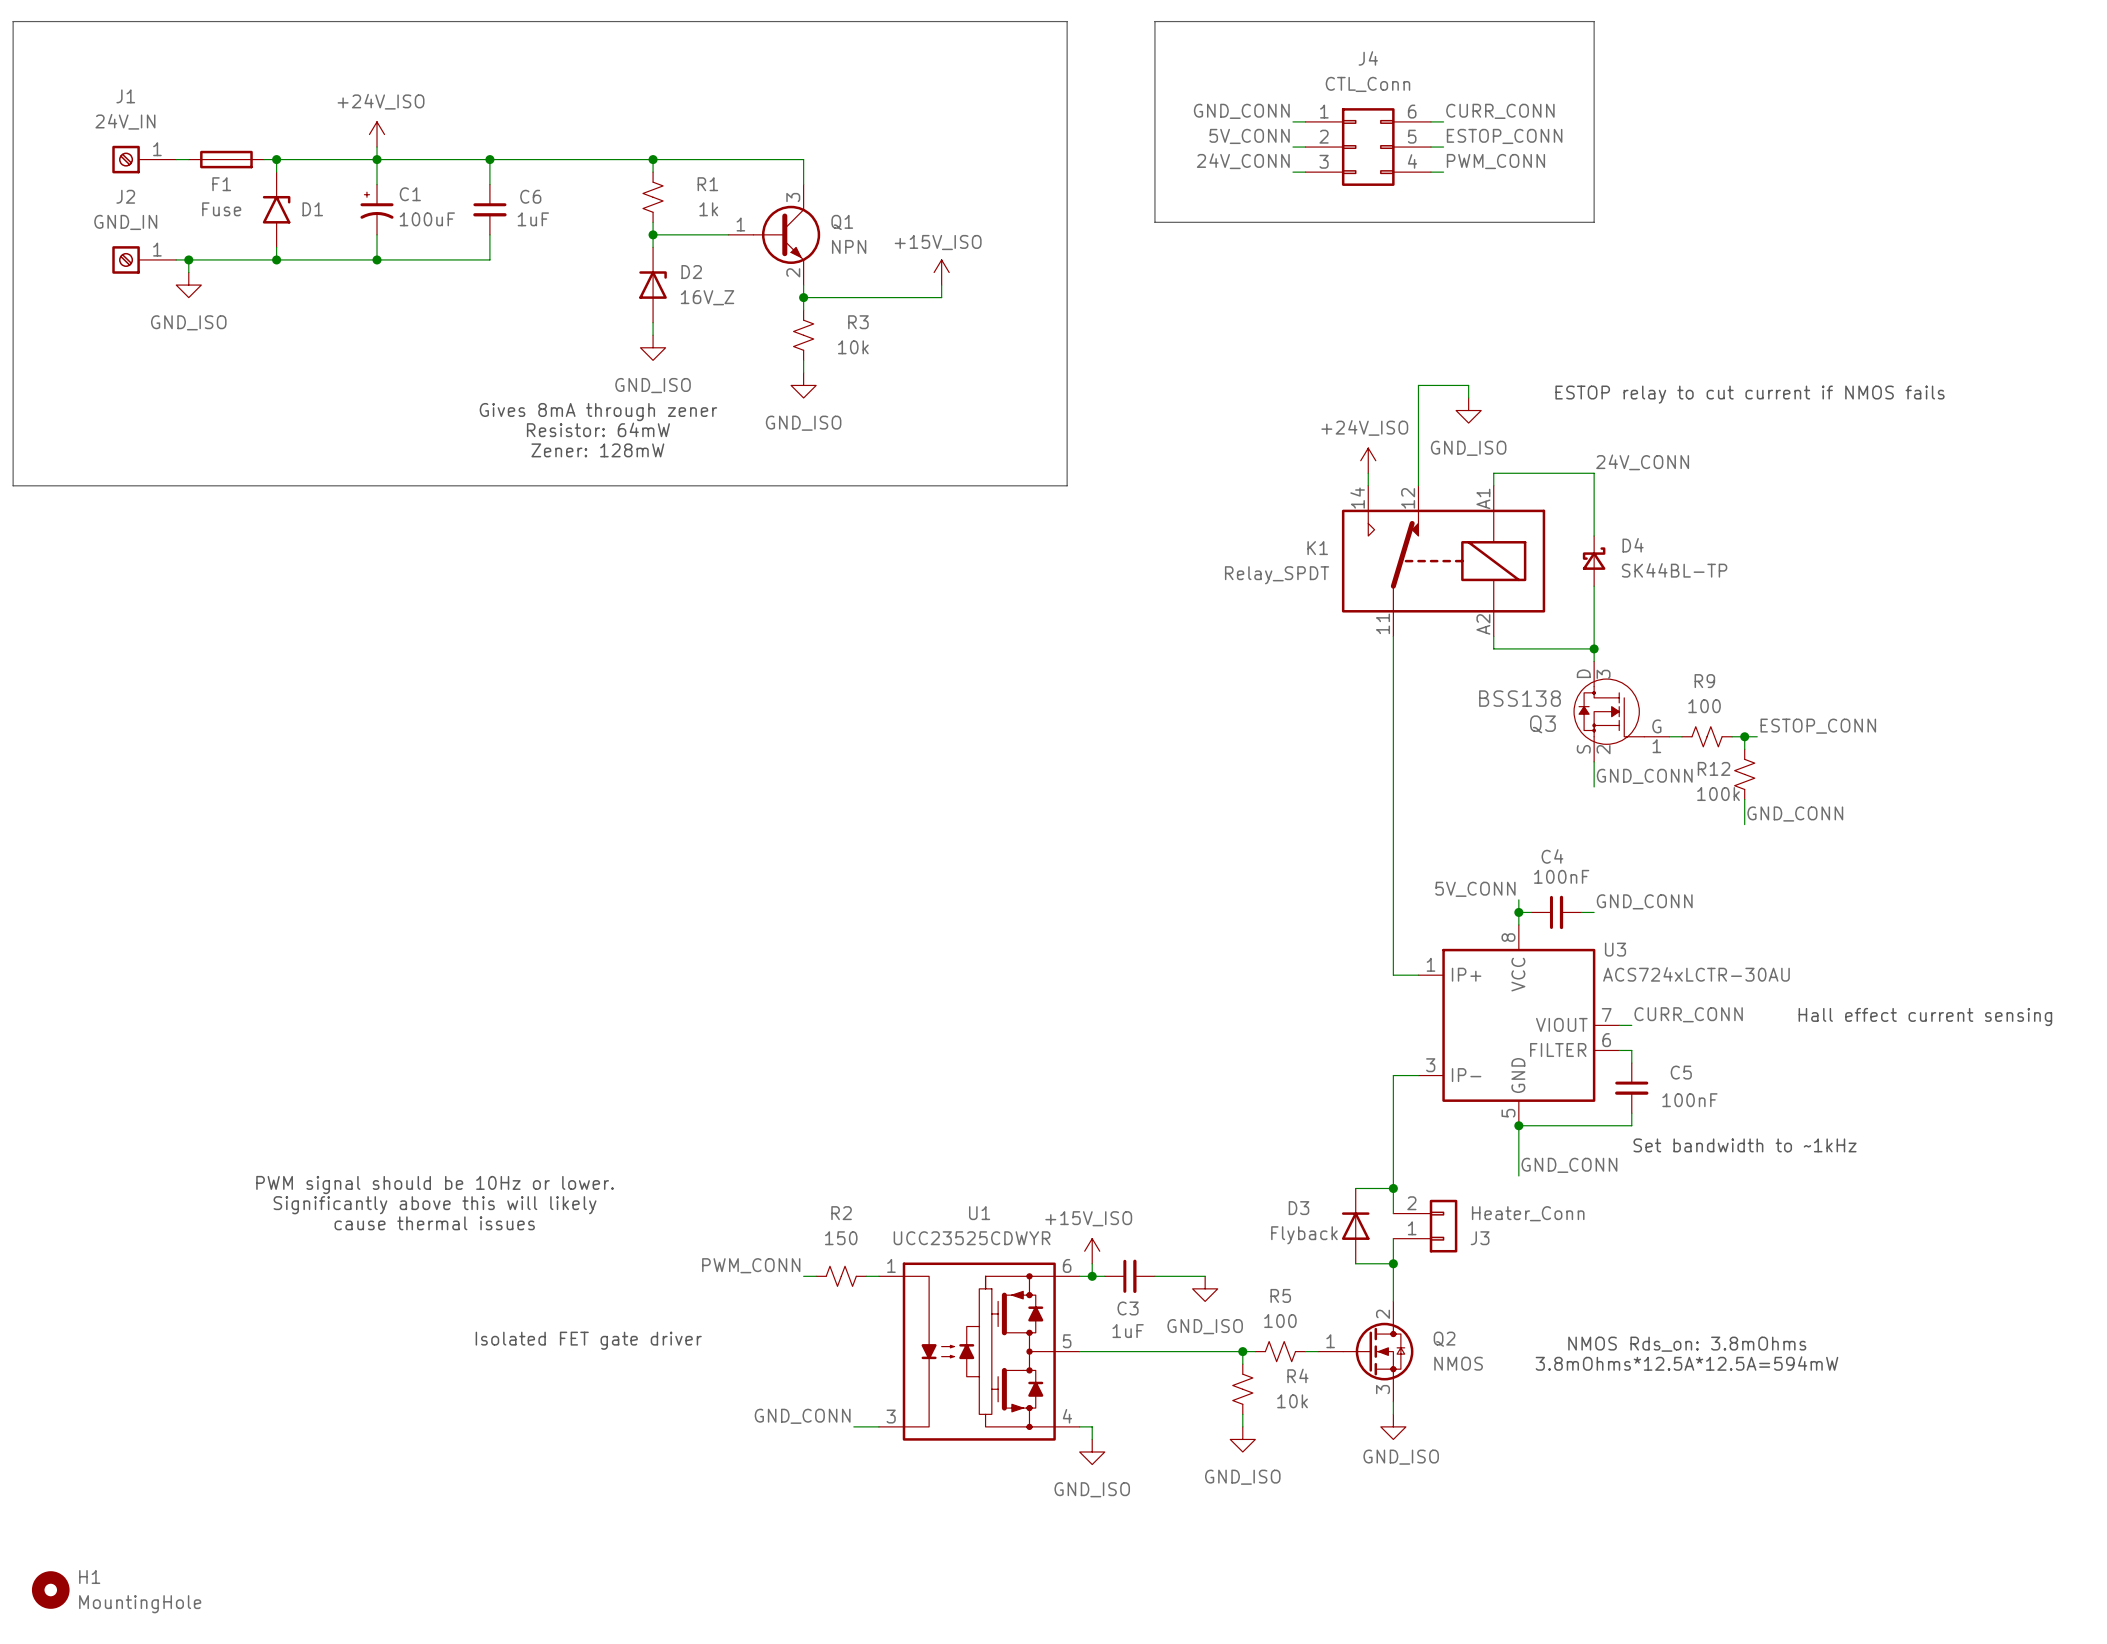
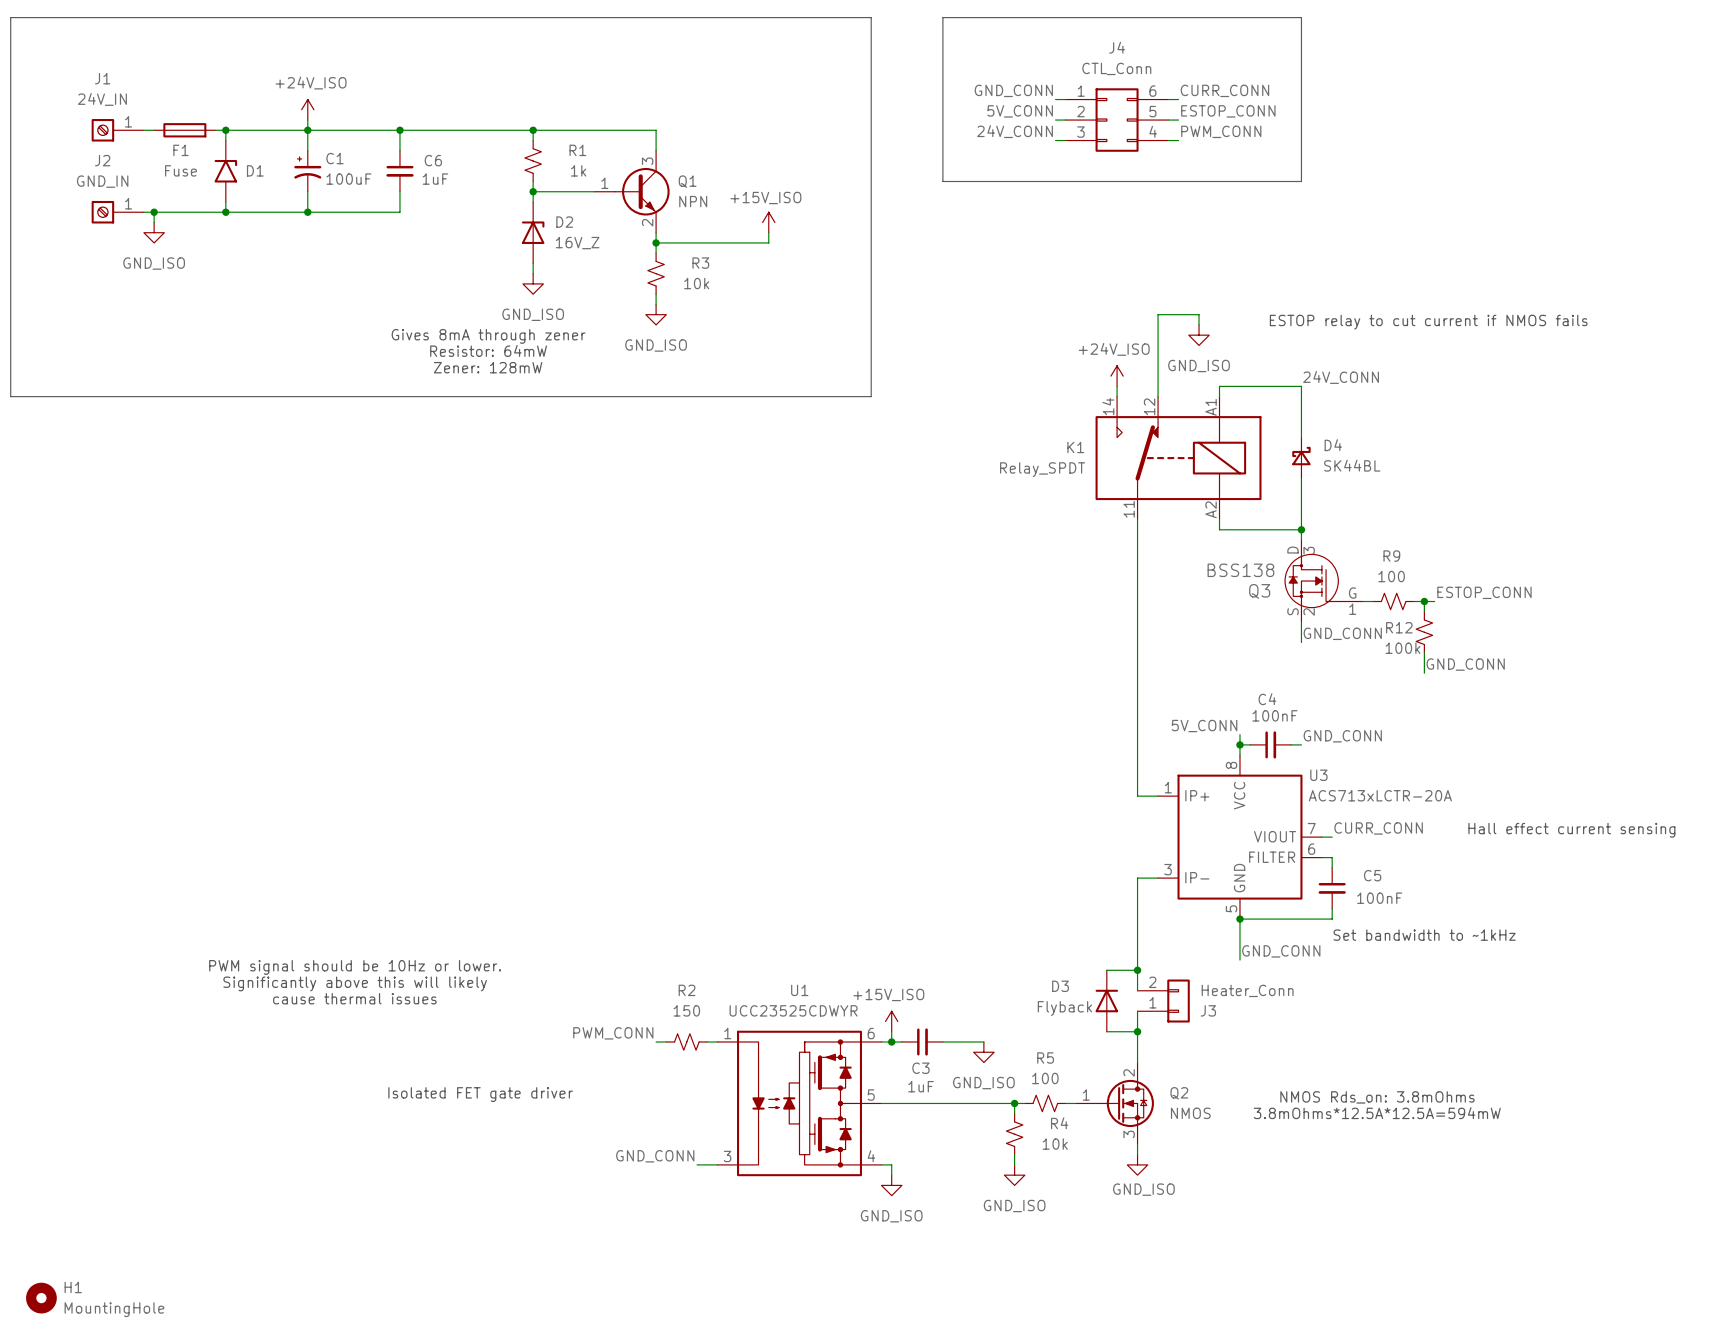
D4 value: SK44BL-TP (1674, 570) -> SK44BL (1352, 465)
U3 value: ACS724xLCTR-30AU (1696, 974) -> ACS713xLCTR-20A (1380, 795)

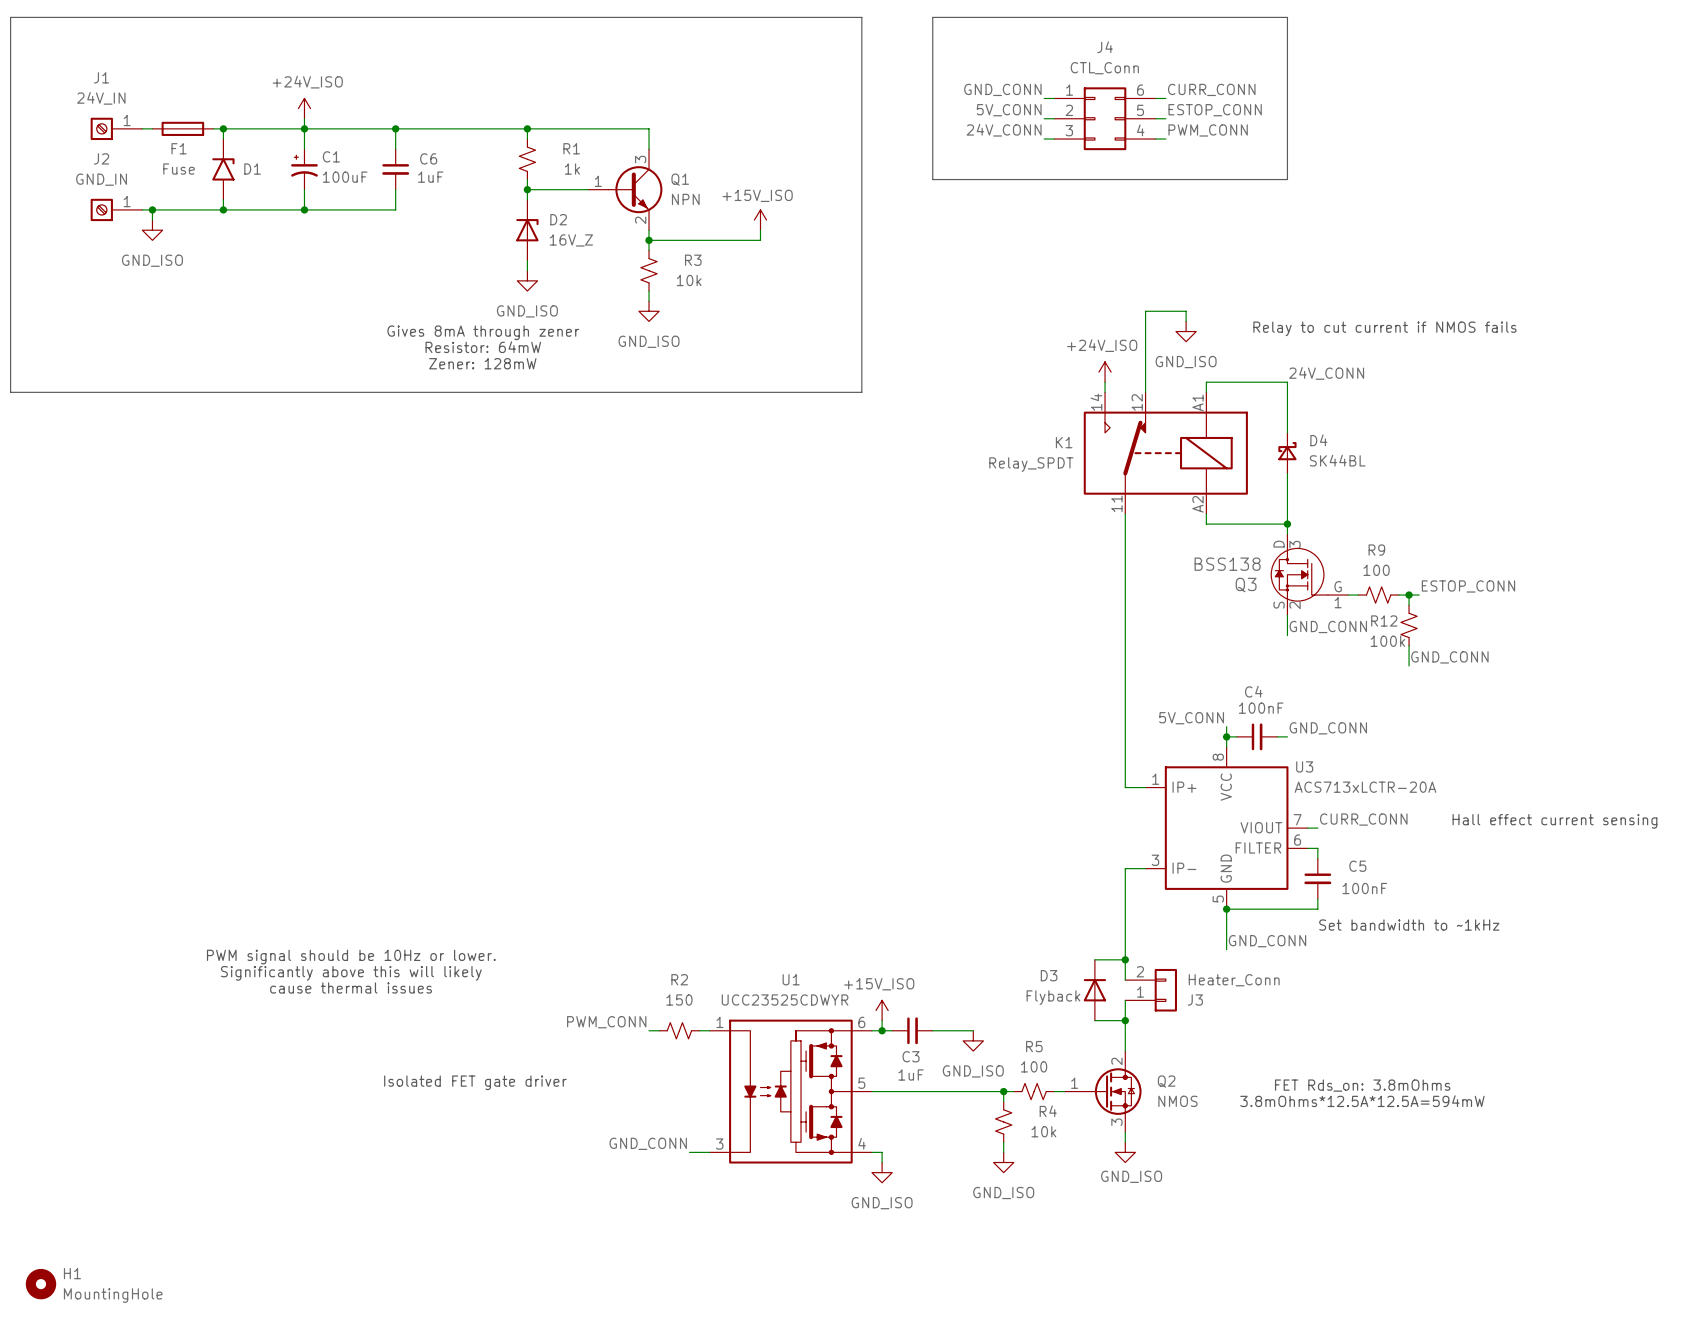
text: ESTOP relay to cut current if NMOS fails (1428, 322) -> Relay to cut current if NMOS fails (1384, 328)
text: NMOS Rds_on: 3.8mOhms (1377, 1097) -> FET Rds_on: 3.8mOhms (1362, 1085)

